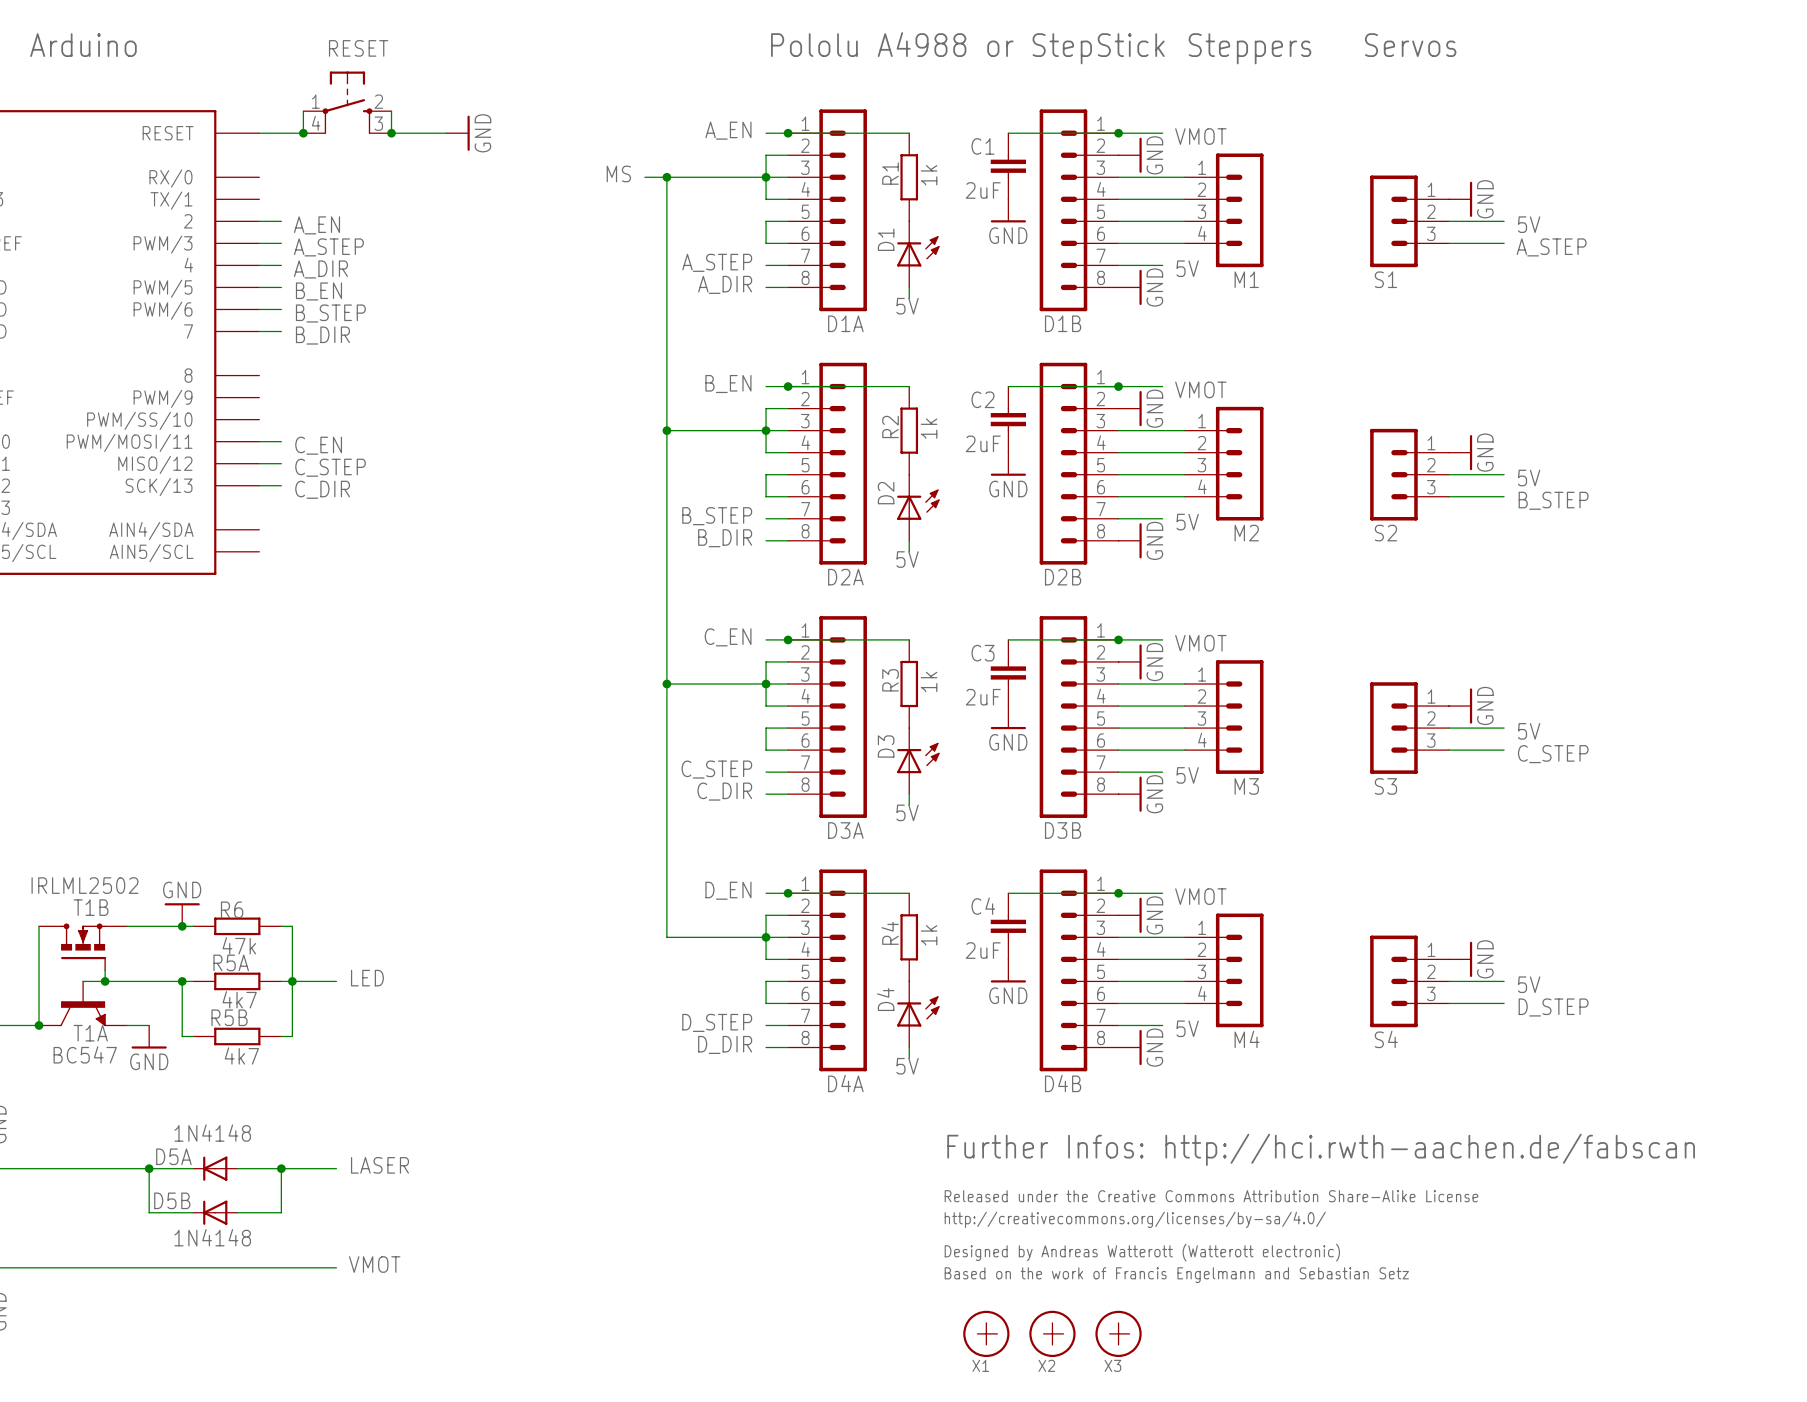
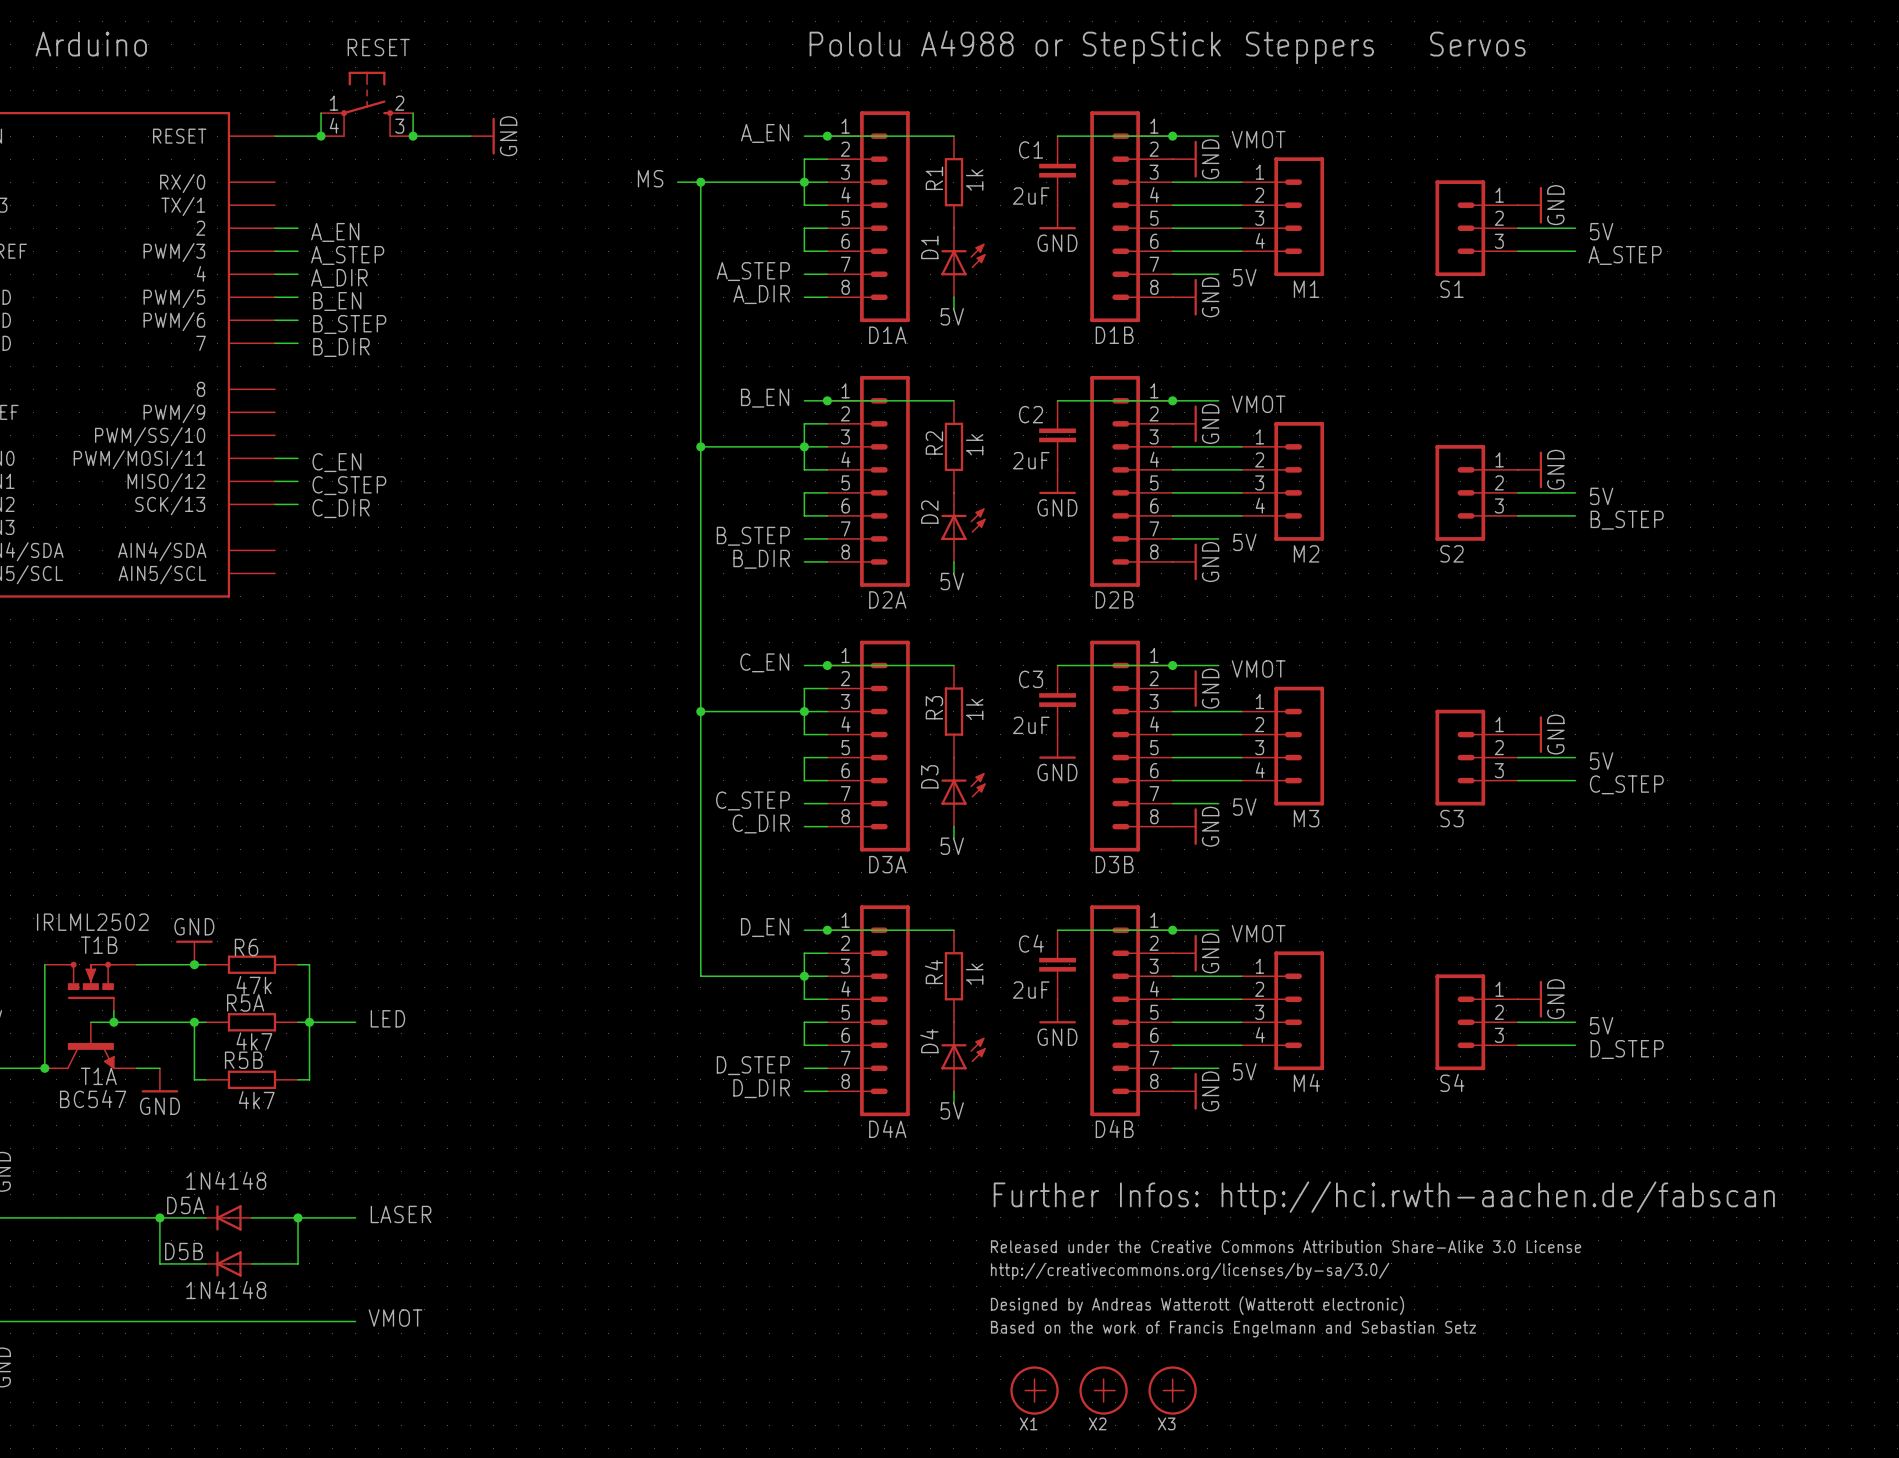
text: Released under the Creative Commons Attribution Share-Alike License (1211, 1196) -> Released under the Creative Commons Attribution Share-Alike 3.0 License (1286, 1246)
text: http://creativecommons.org/licenses/by-sa/4.0/ (1135, 1219) -> http://creativecommons.org/licenses/by-sa/3.0/ (1190, 1271)

